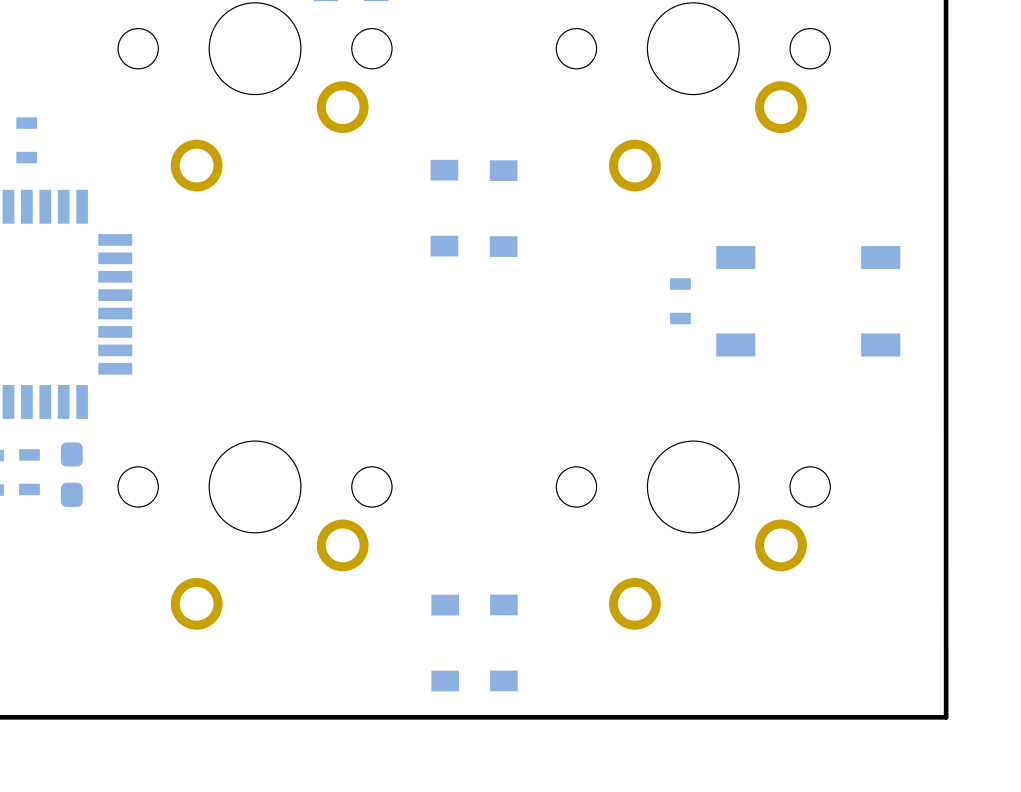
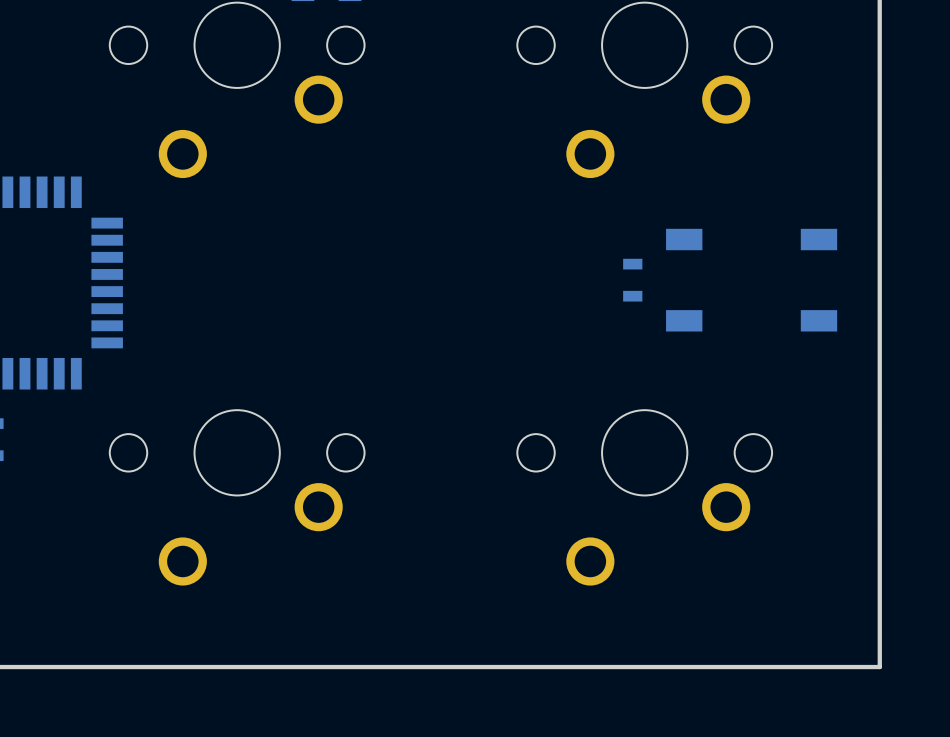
part: (26, 140) -> none
part: (444, 208) -> none
part: (503, 208) -> none
part: (29, 472) -> none
part: (71, 474) -> none
part: (503, 642) -> none
part: (445, 643) -> none

